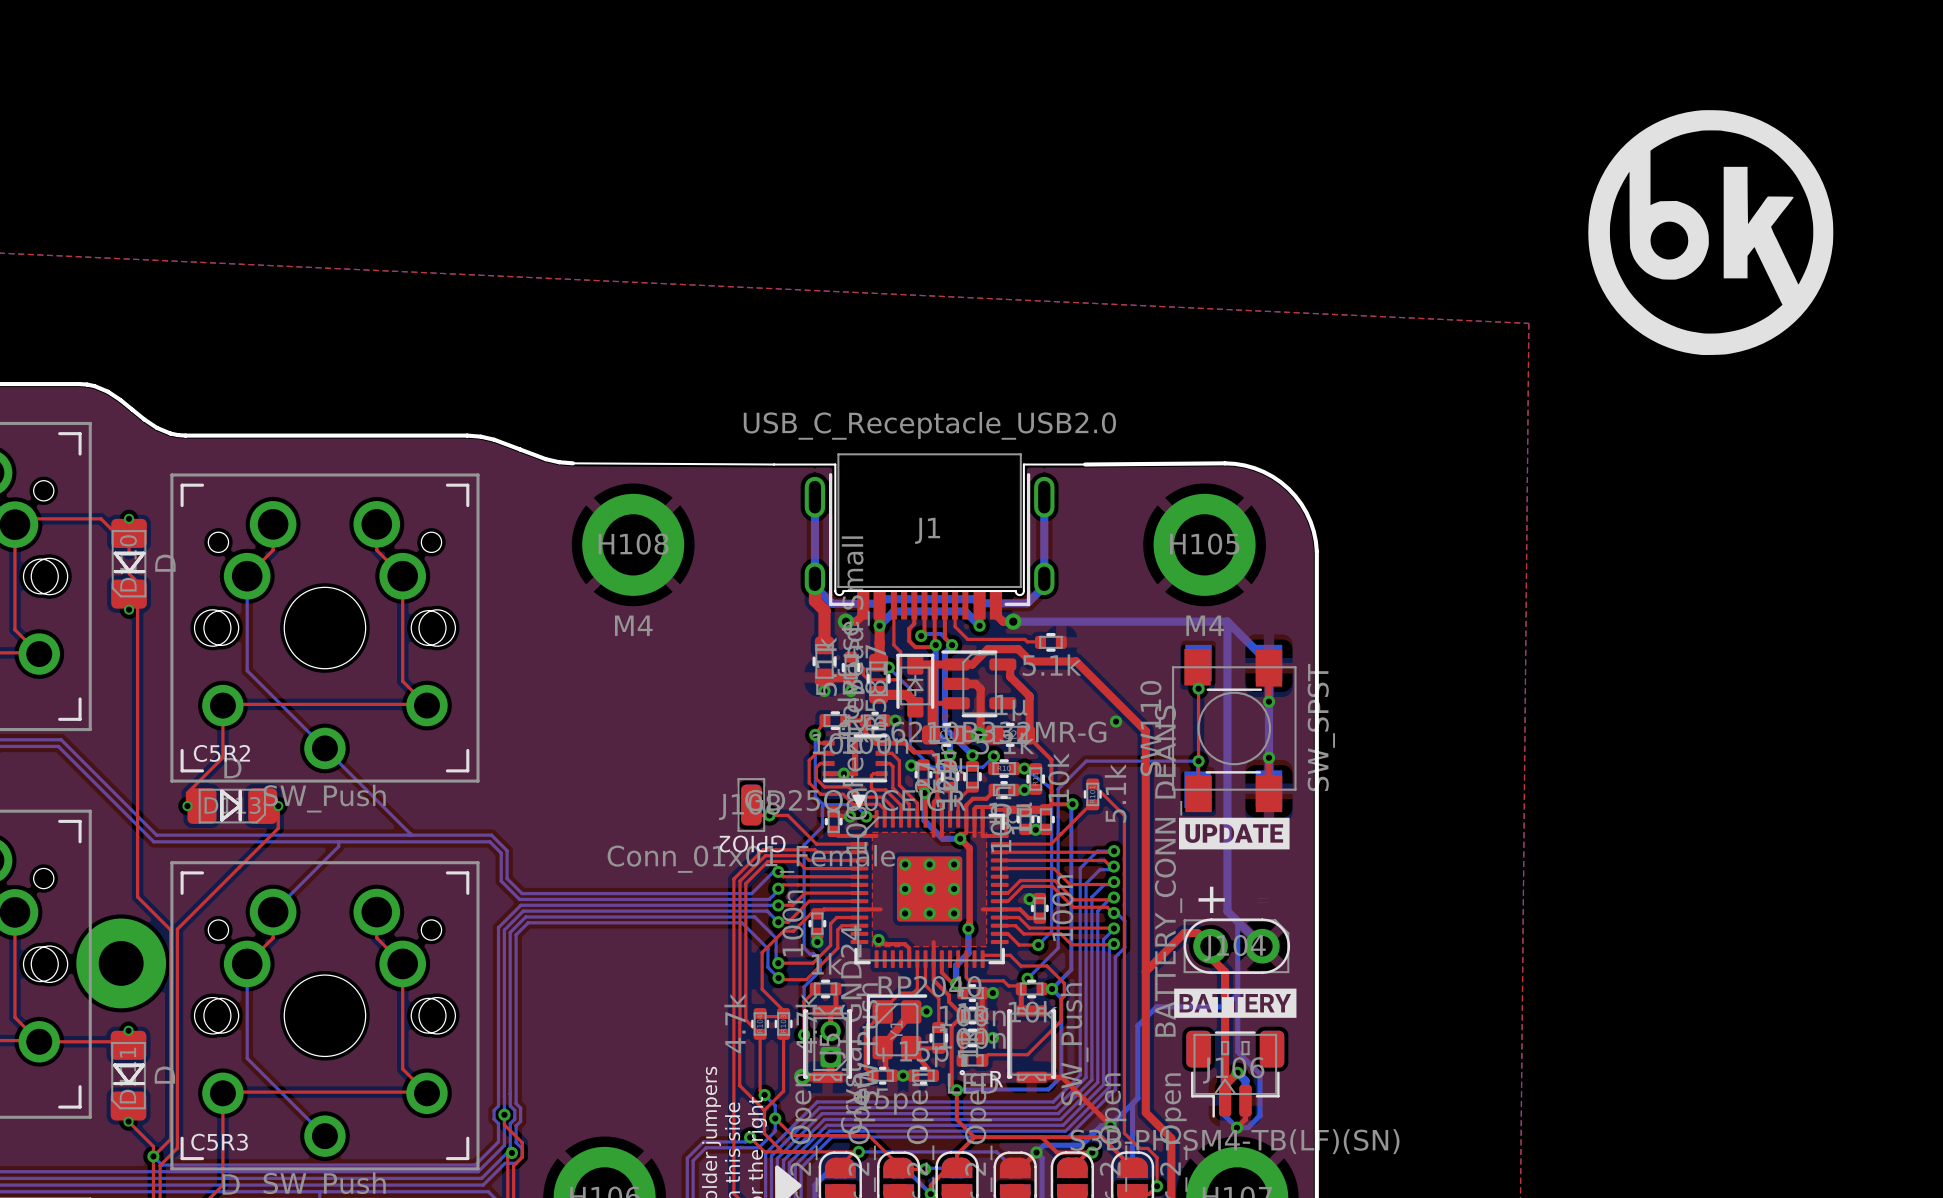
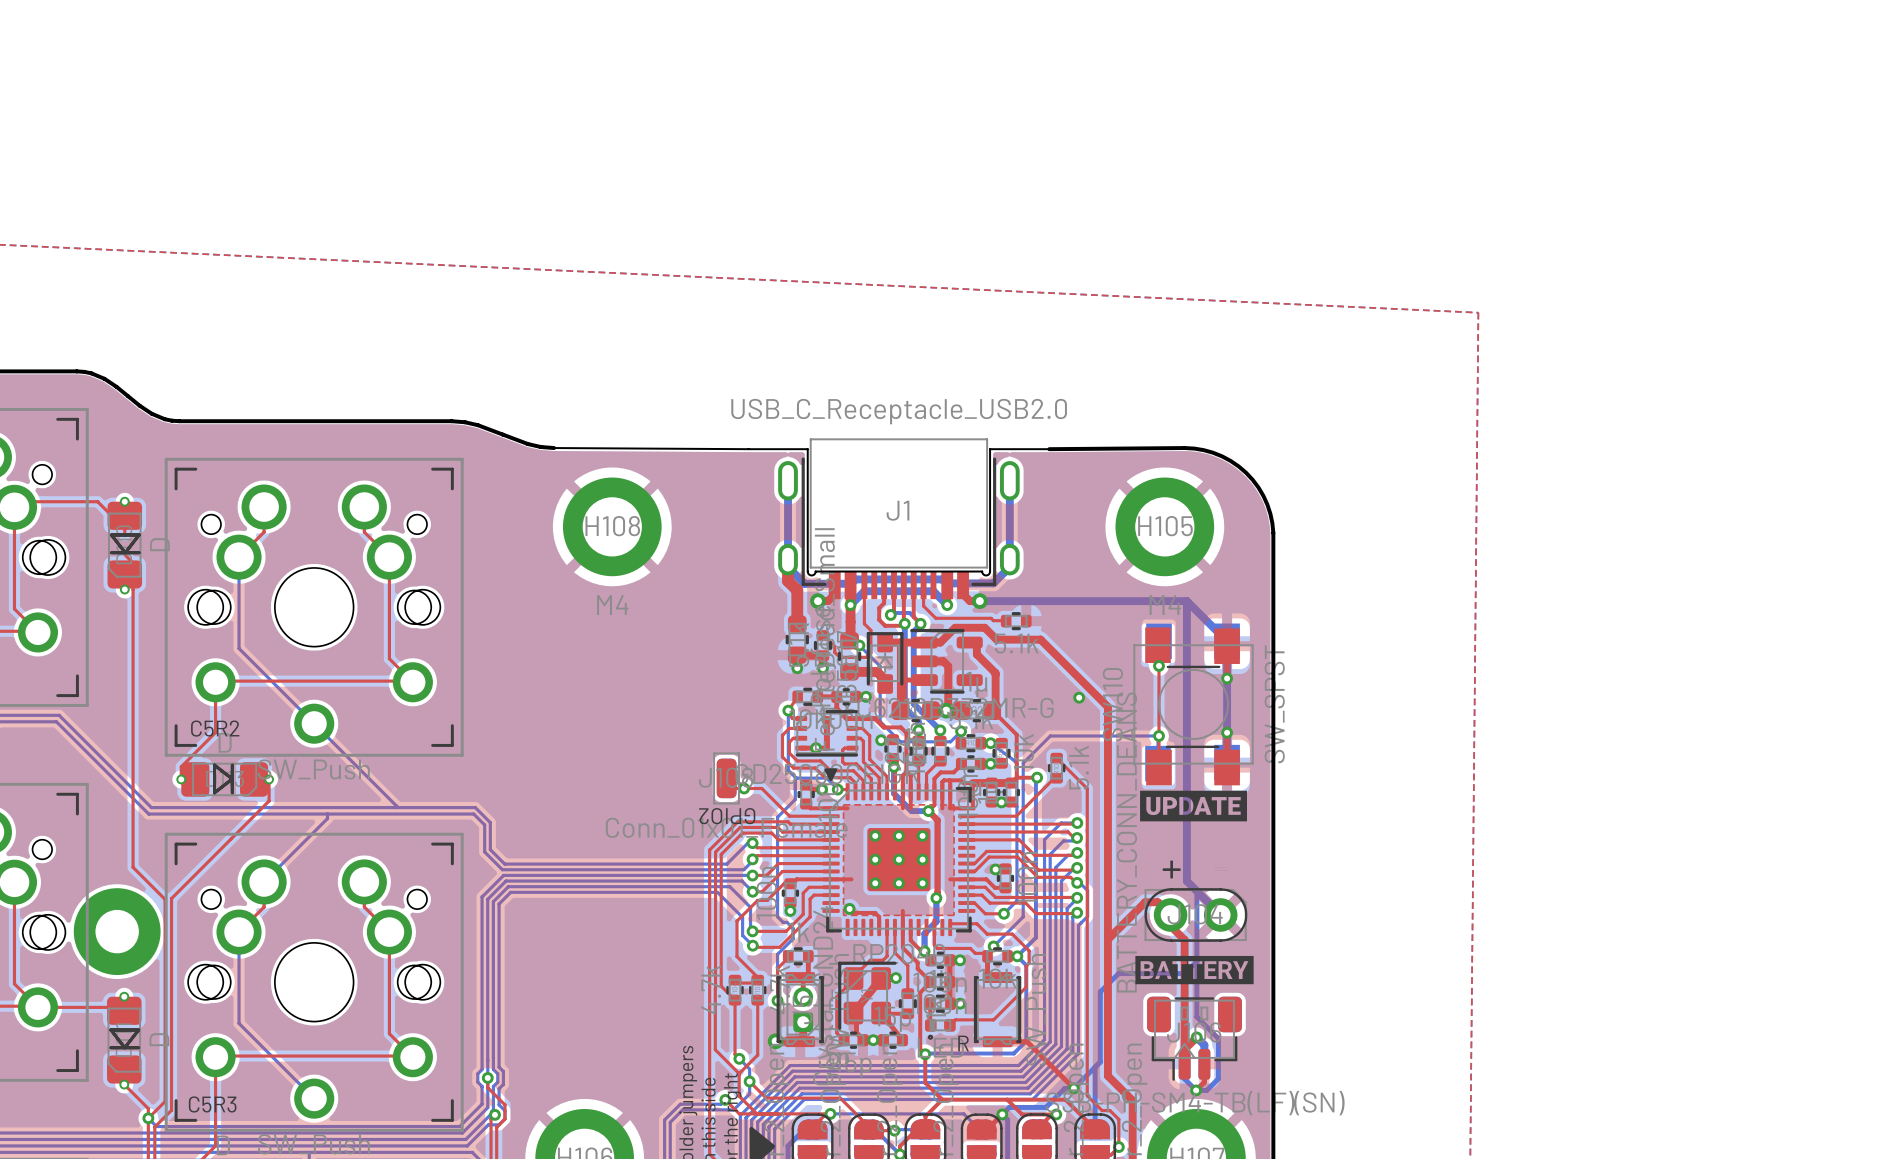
drawing: [1588, 110, 1834, 356] -> none

